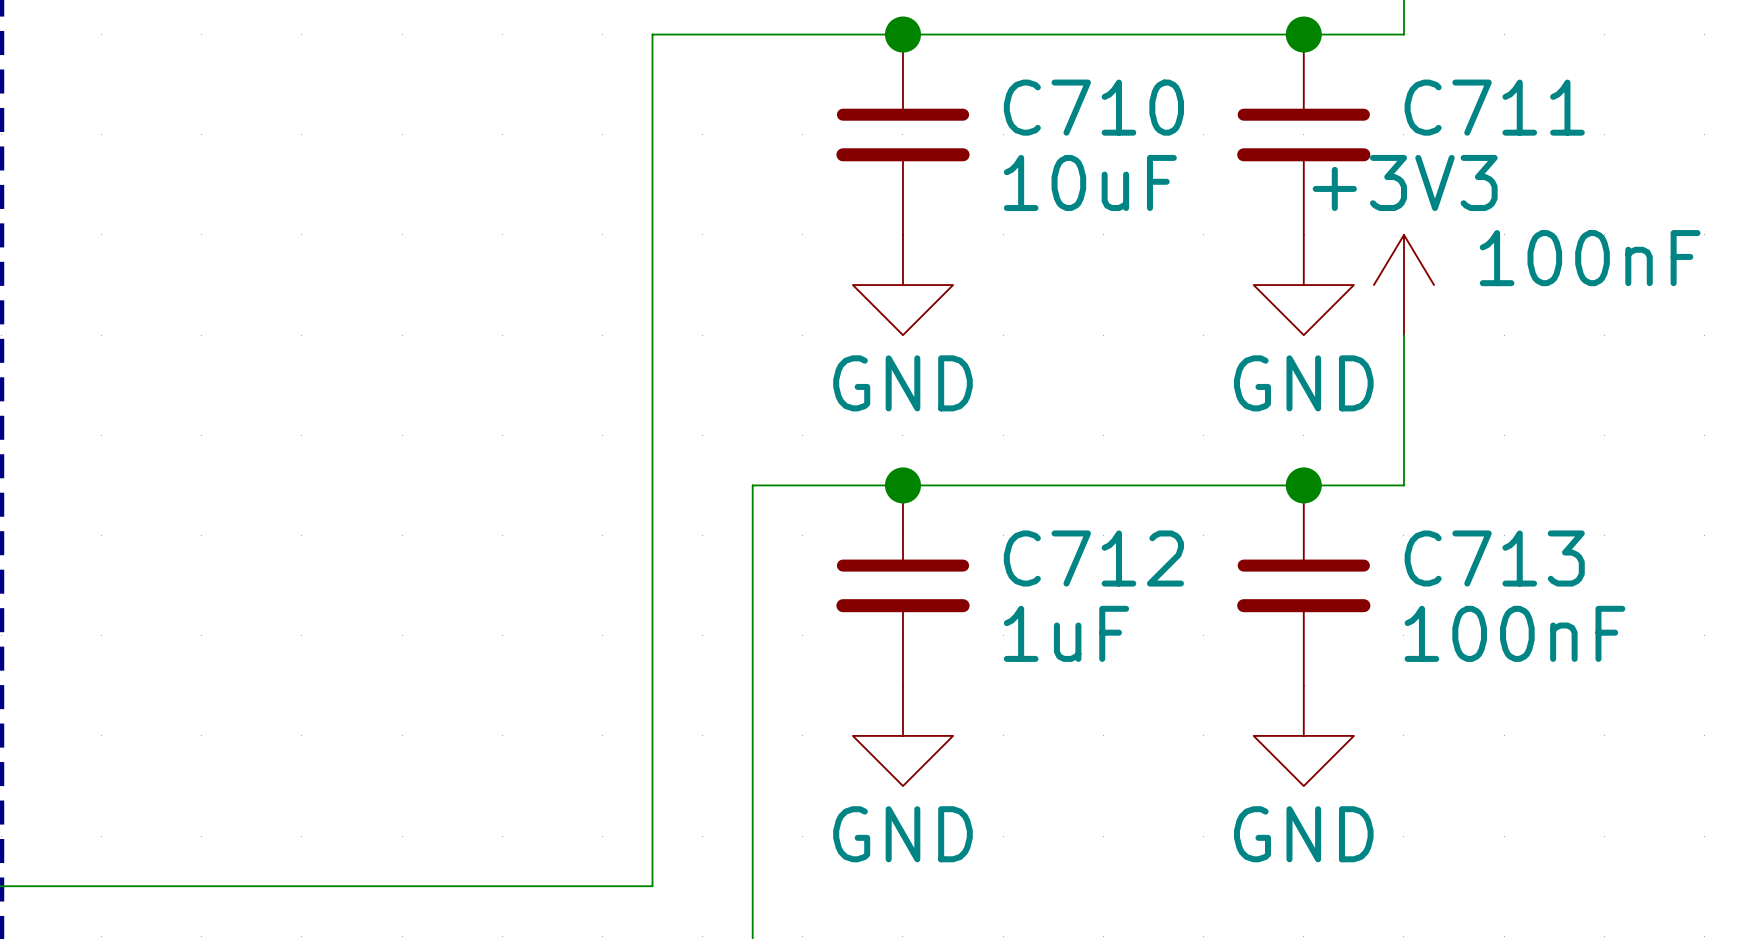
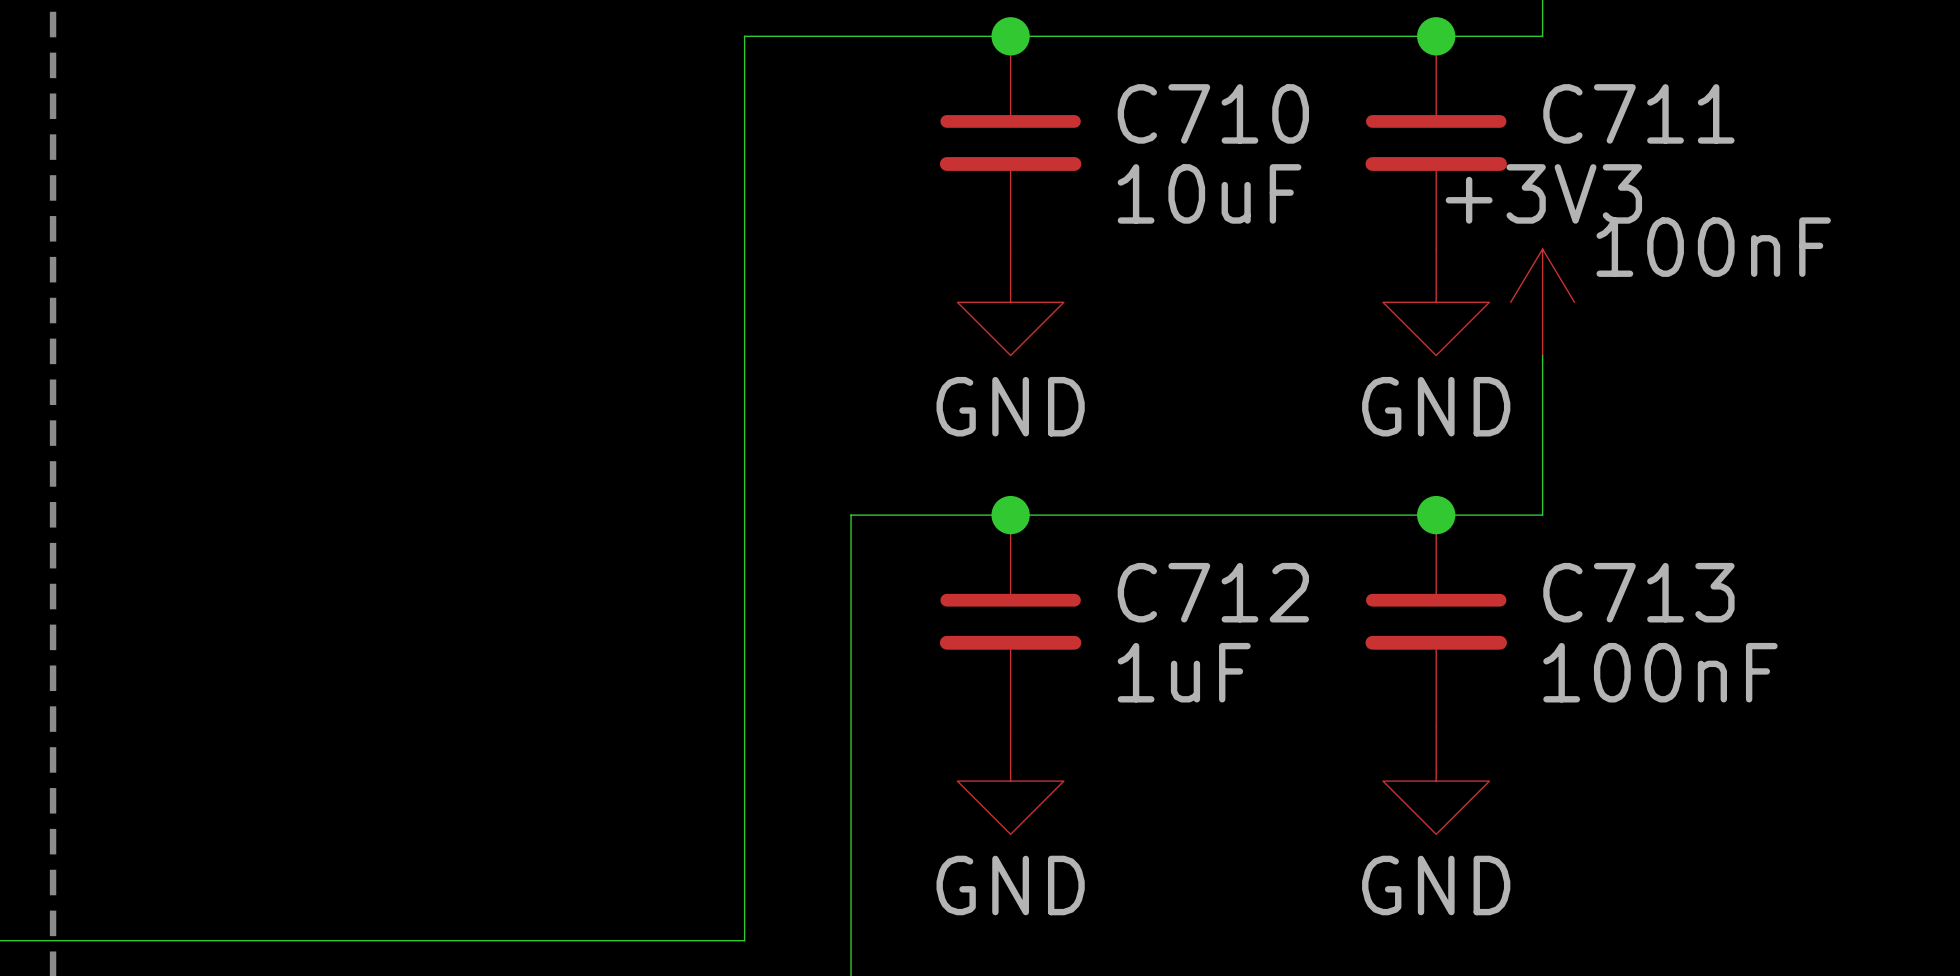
C711 value position: 100nF (1590, 258) -> 100nF (1713, 247)

